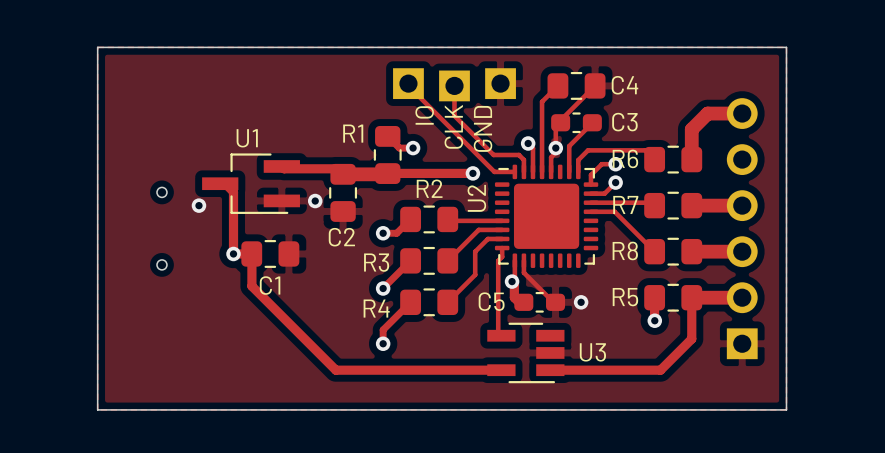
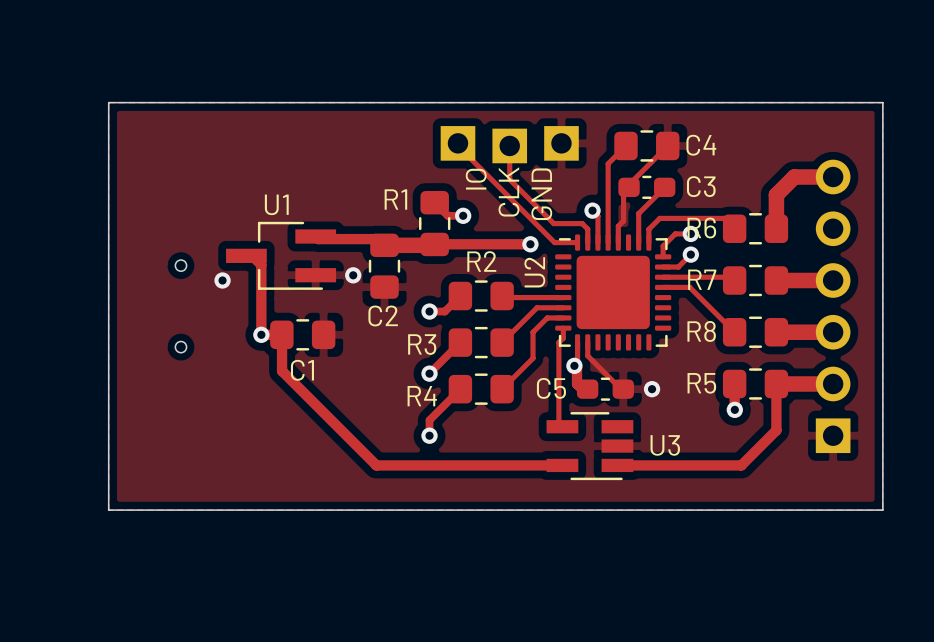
via: (555, 148) -> none

